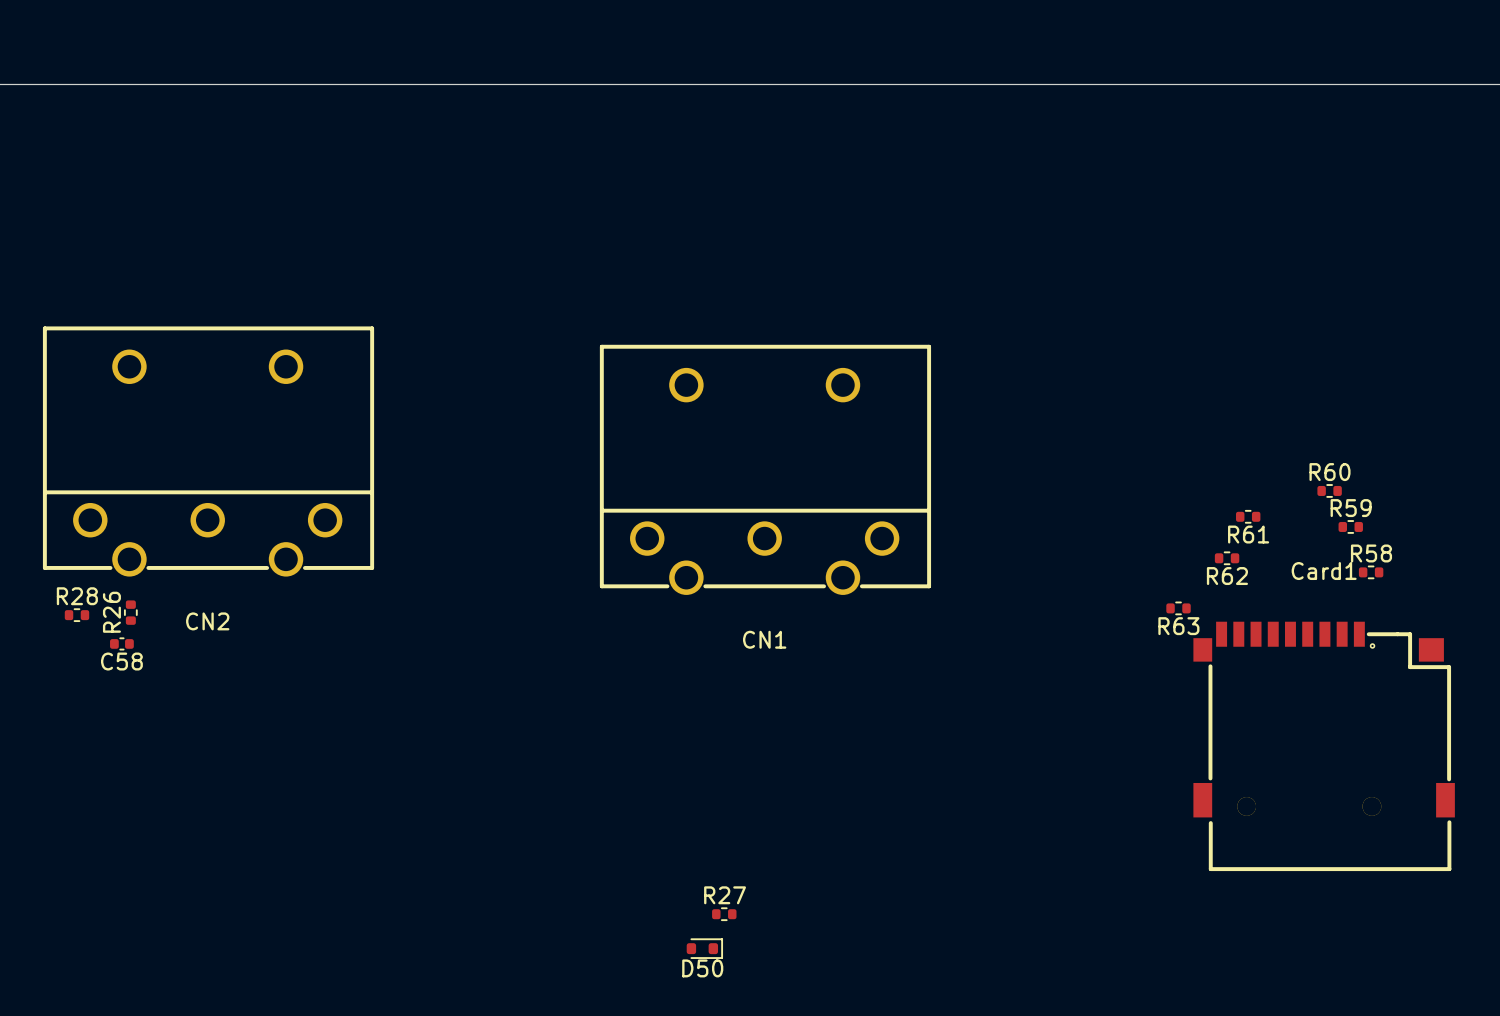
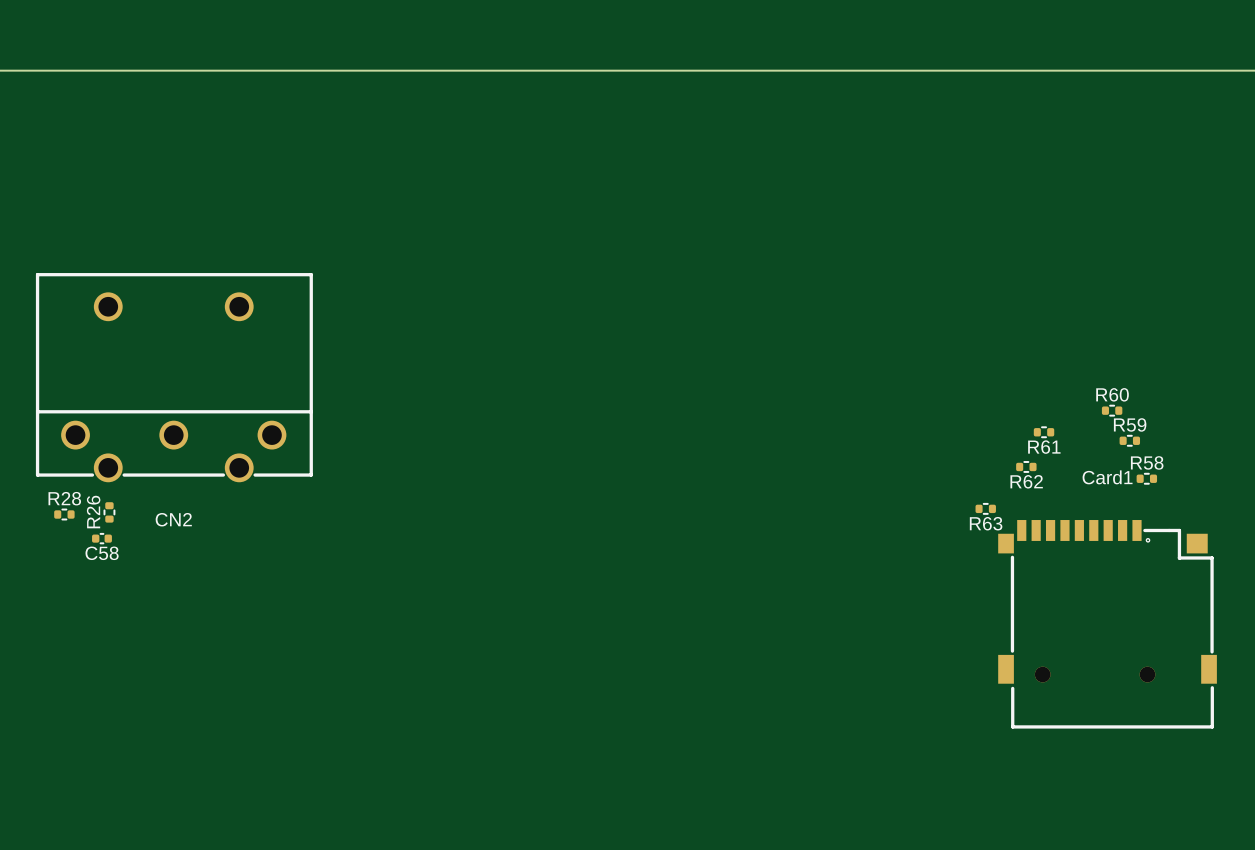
CN1: (765, 469) -> none
R27: (724, 914) -> none
D50: (704, 948) -> none

